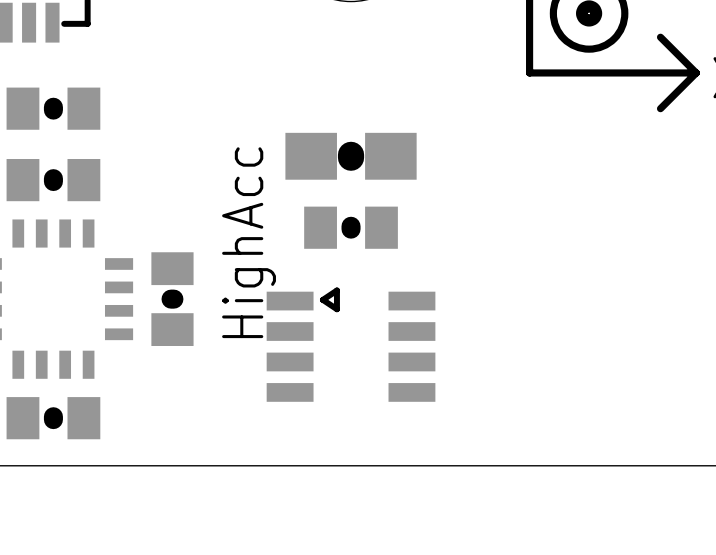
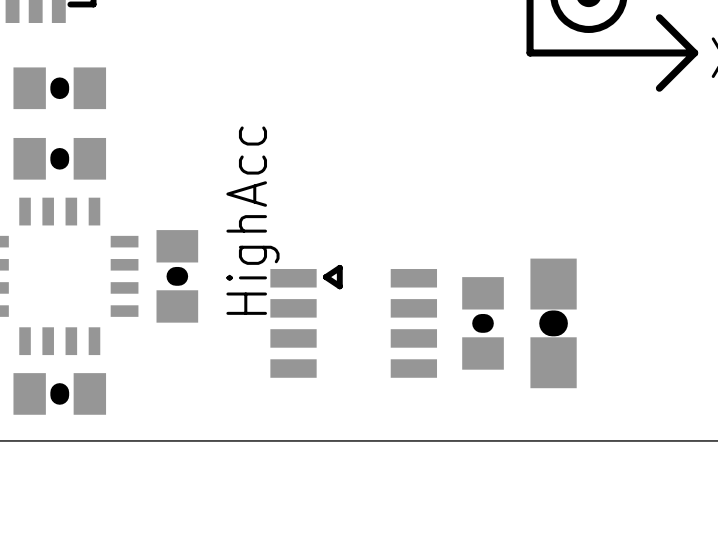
part rotation: 0° (351, 156) -> 90° clockwise (553, 323)
part position: (351, 156) -> (553, 323)
part rotation: 0° (351, 227) -> 90° clockwise (483, 323)
part position: (351, 227) -> (483, 323)

